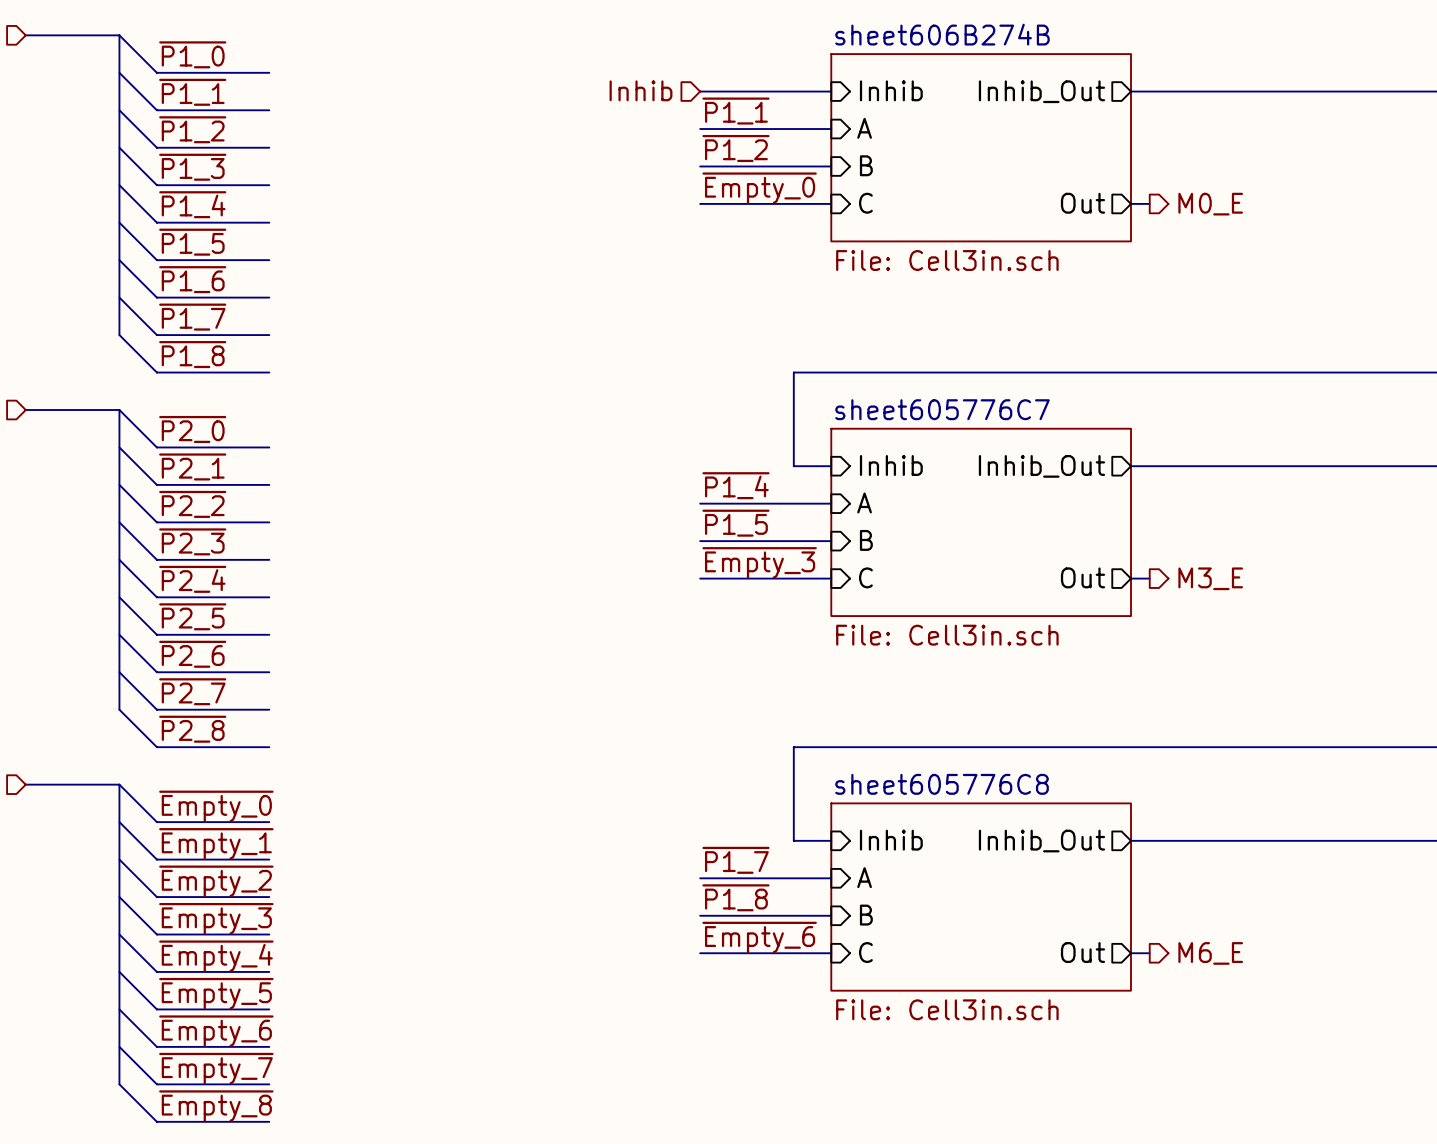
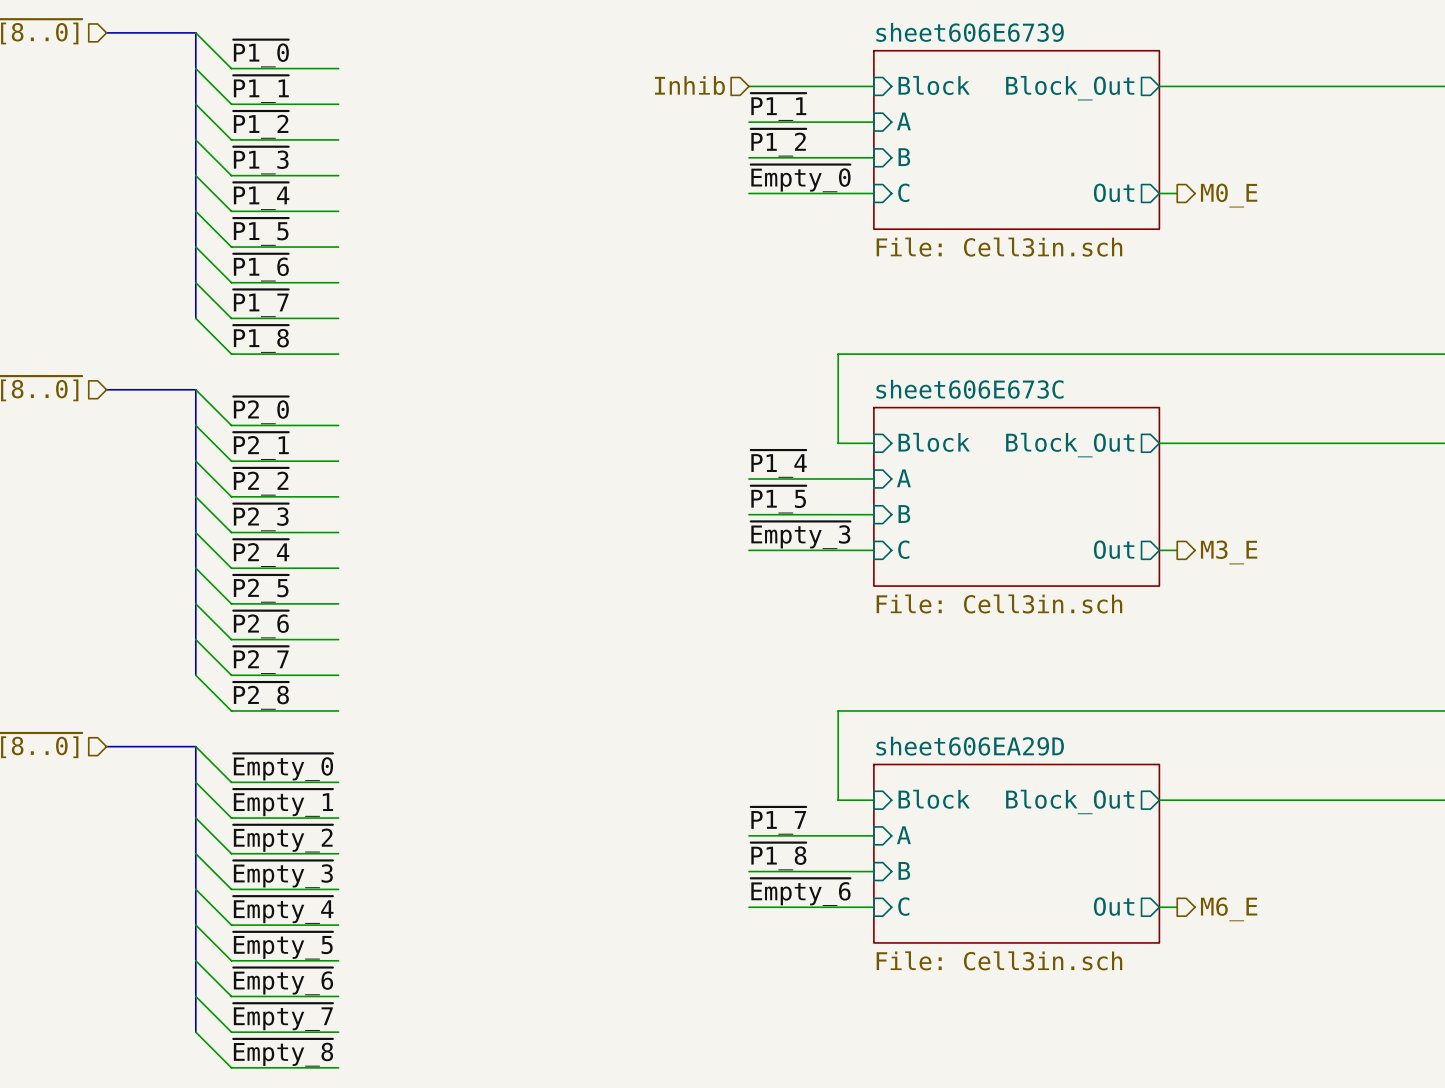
sheet sheet606B274B name: sheet606B274B (942, 34) -> sheet606E6739 (970, 32)
sheet pin: Inhib (891, 90) -> Block (934, 85)
sheet pin: Inhib_Out (1041, 91) -> Block_Out (1070, 88)
sheet sheet605776C7 name: sheet605776C7 (942, 409) -> sheet606E673C (969, 389)
sheet pin: Inhib (891, 465) -> Block (934, 442)
sheet pin: Inhib_Out (1041, 466) -> Block_Out (1070, 445)
sheet sheet605776C8 name: sheet605776C8 (942, 784) -> sheet606EA29D (970, 746)
sheet pin: Inhib (891, 840) -> Block (934, 799)
sheet pin: Inhib_Out (1041, 841) -> Block_Out (1070, 801)

